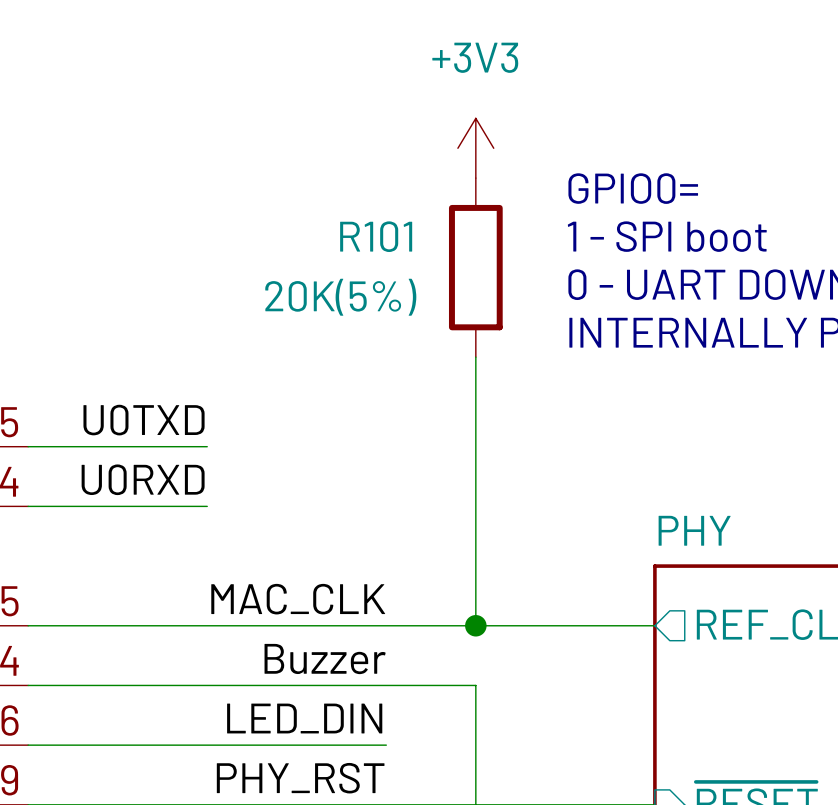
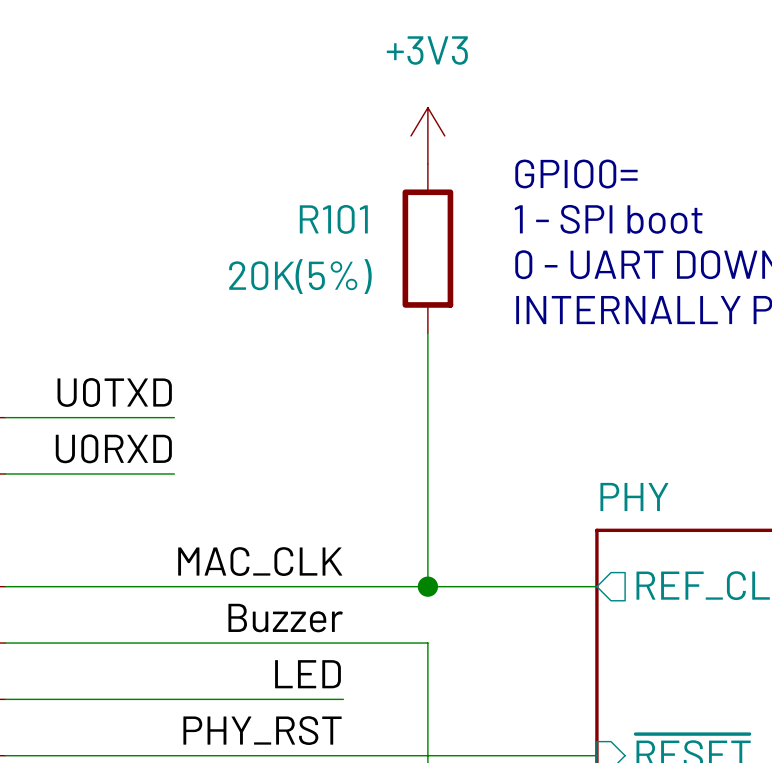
label: LED_DIN (304, 718) -> LED (307, 674)

